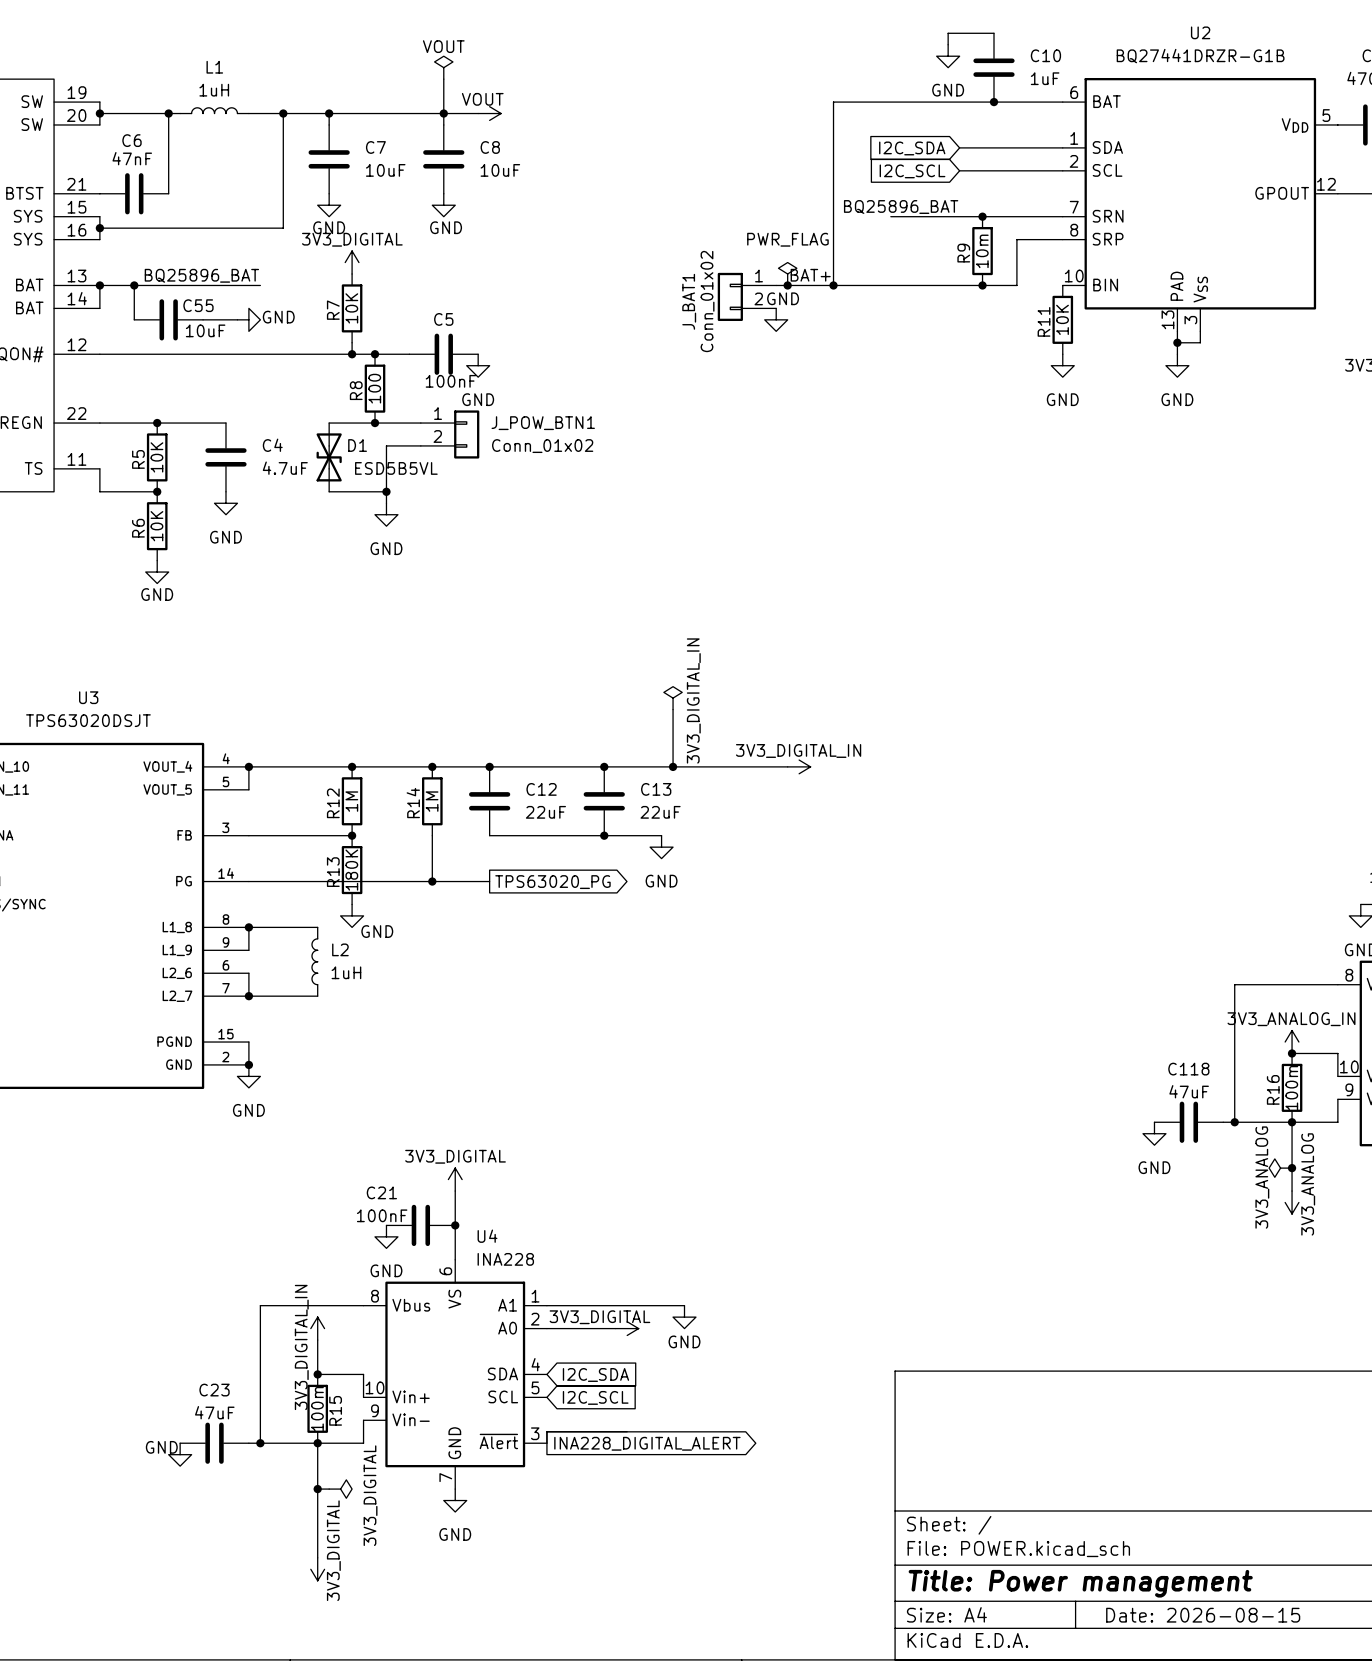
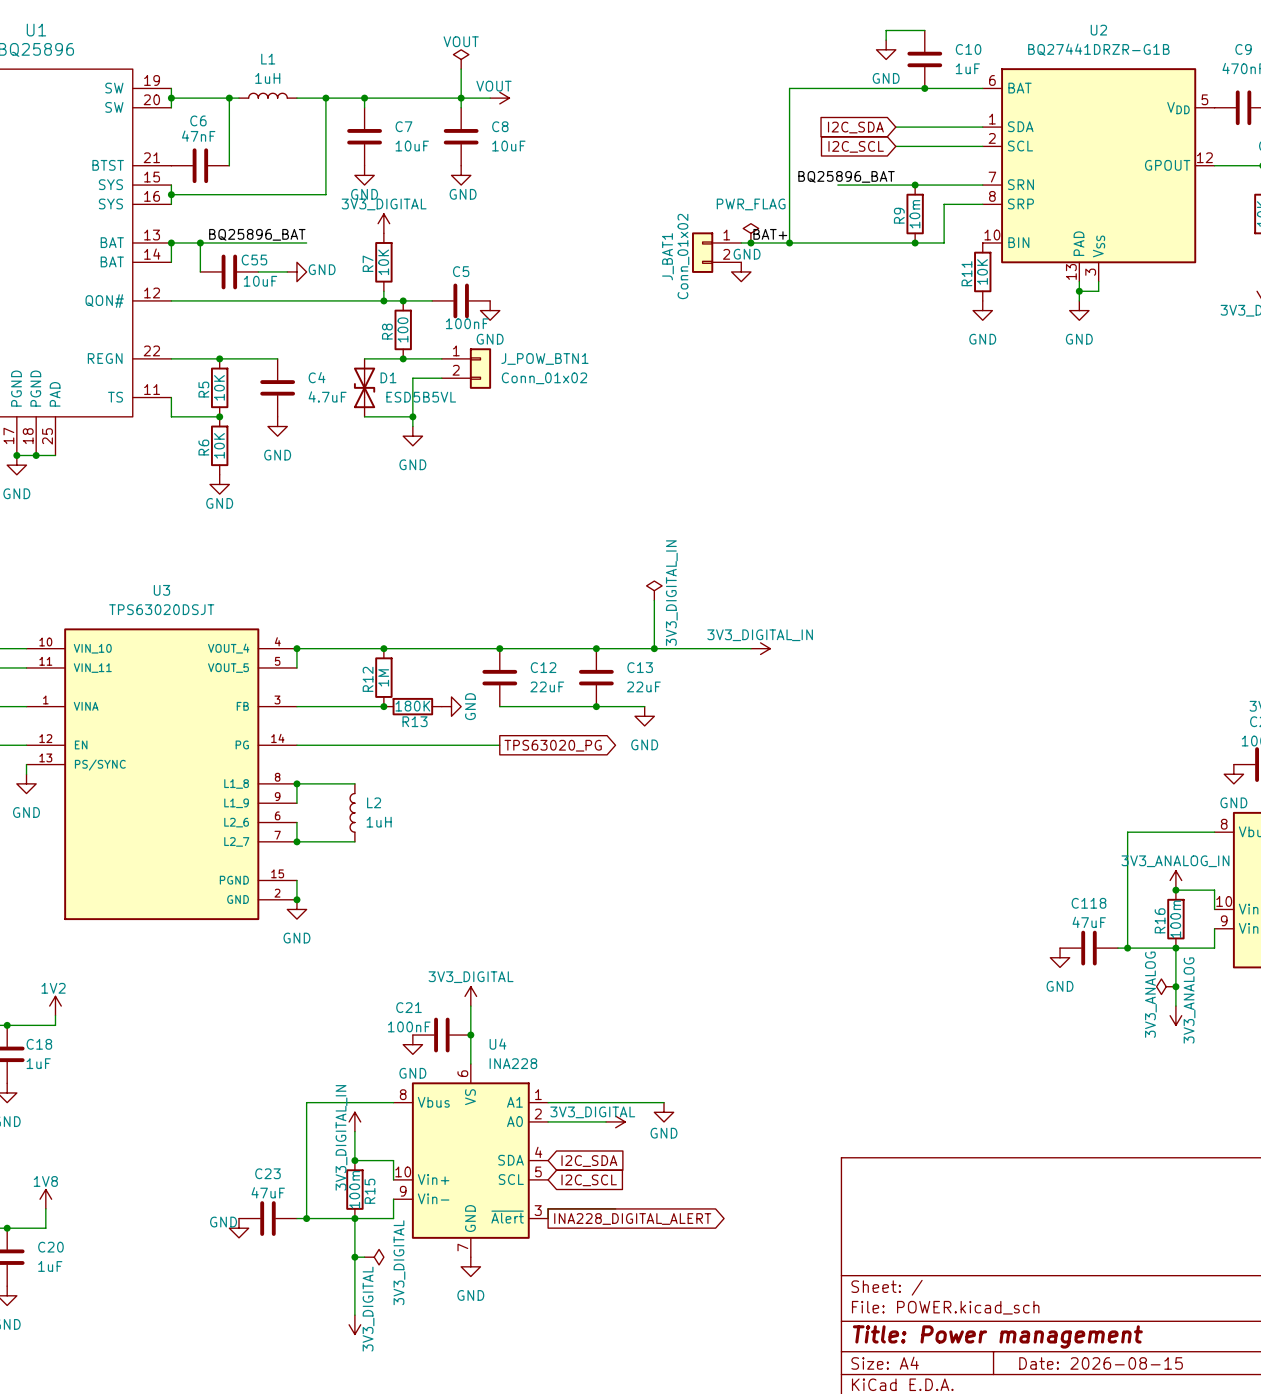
junction: (432, 766) -> none
R14: 1M (432, 801) -> none
wire: (432, 835) (432, 881) -> none
R13 rotation: 0° (352, 870) -> 90° clockwise (412, 706)
R13 position: (352, 870) -> (412, 706)
R13 name position: R13 (333, 872) -> R13 (415, 721)
junction: (432, 881) -> none
power symbol rotation: 0° (352, 915) -> 90° counterclockwise (451, 706)
power symbol position: GND (352, 915) -> GND (451, 706)

